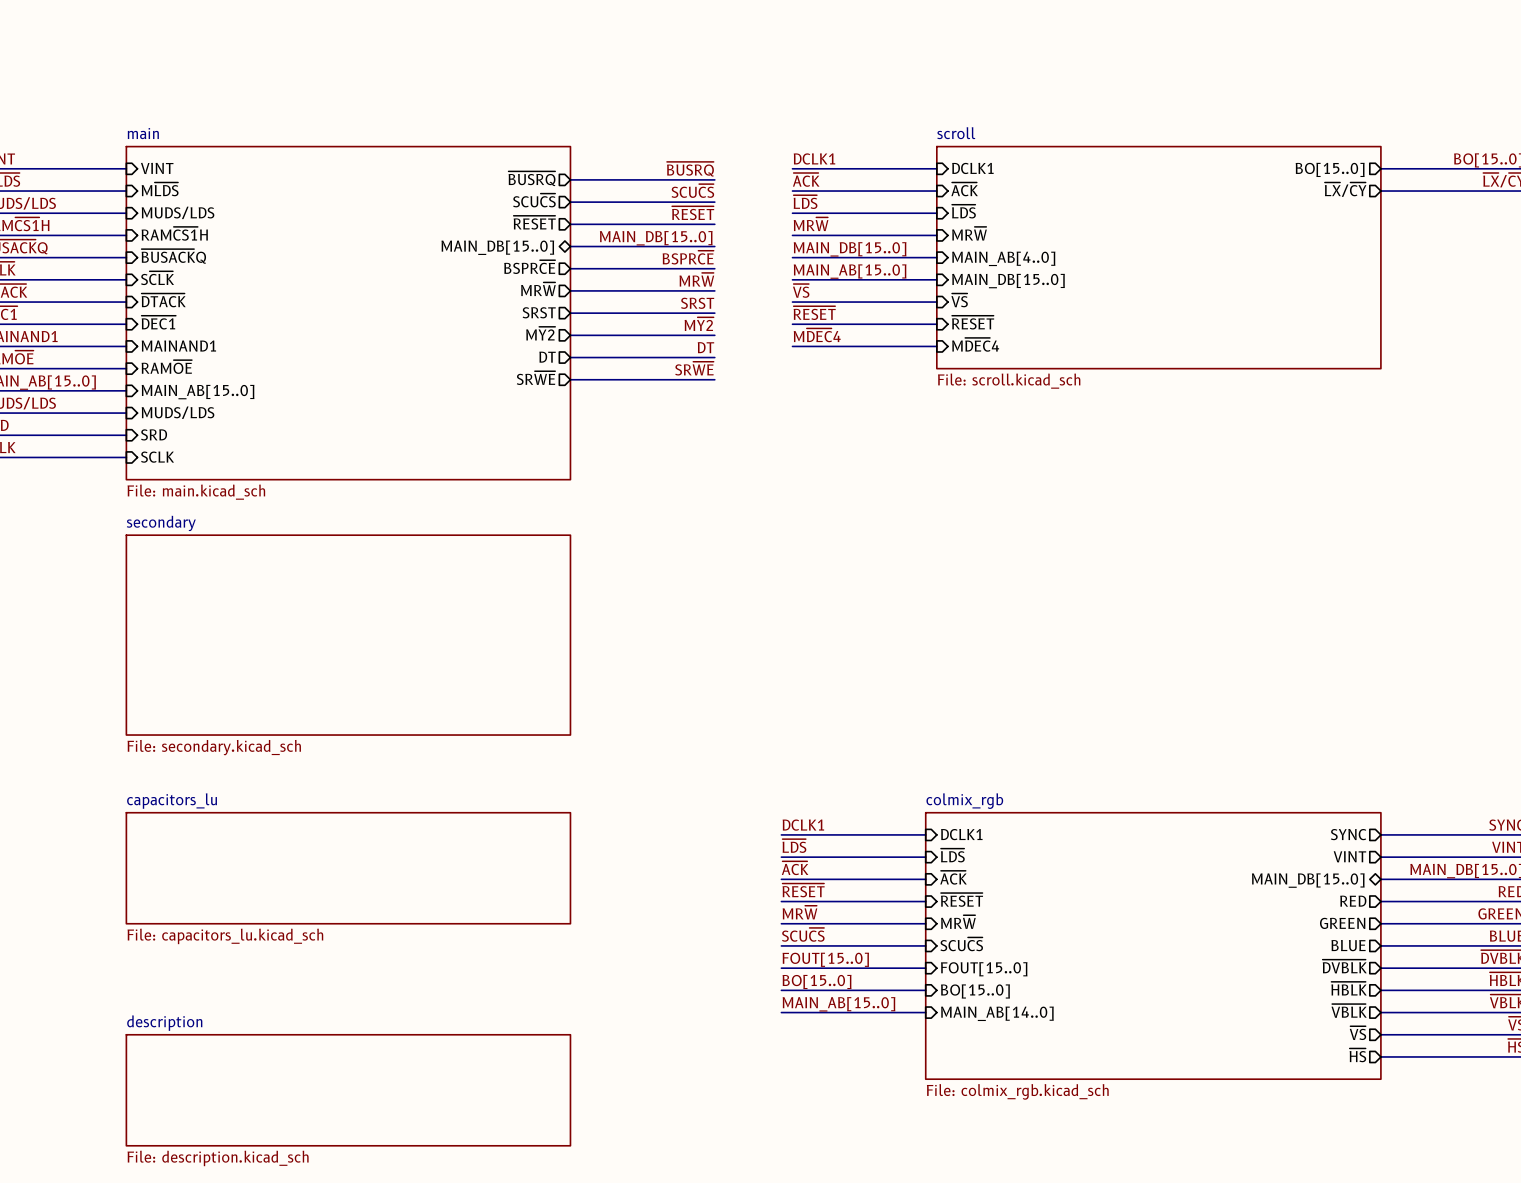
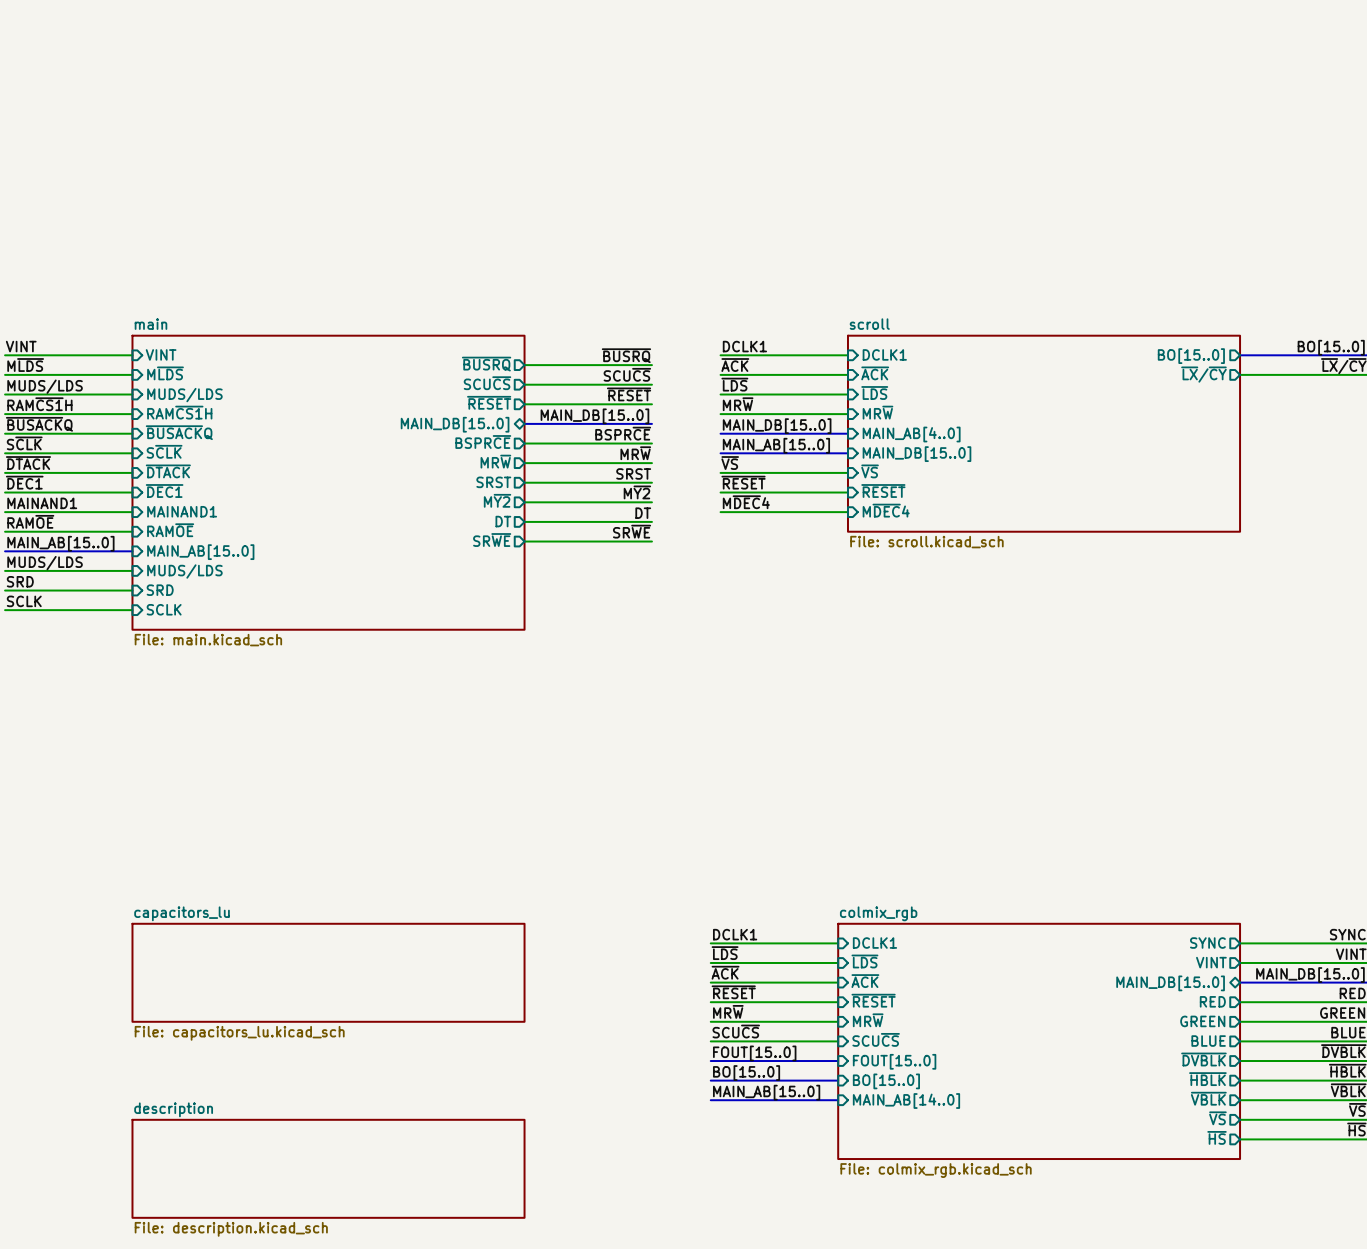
sheet secondary: File: secondary.kicad_sch (348, 635) -> none

